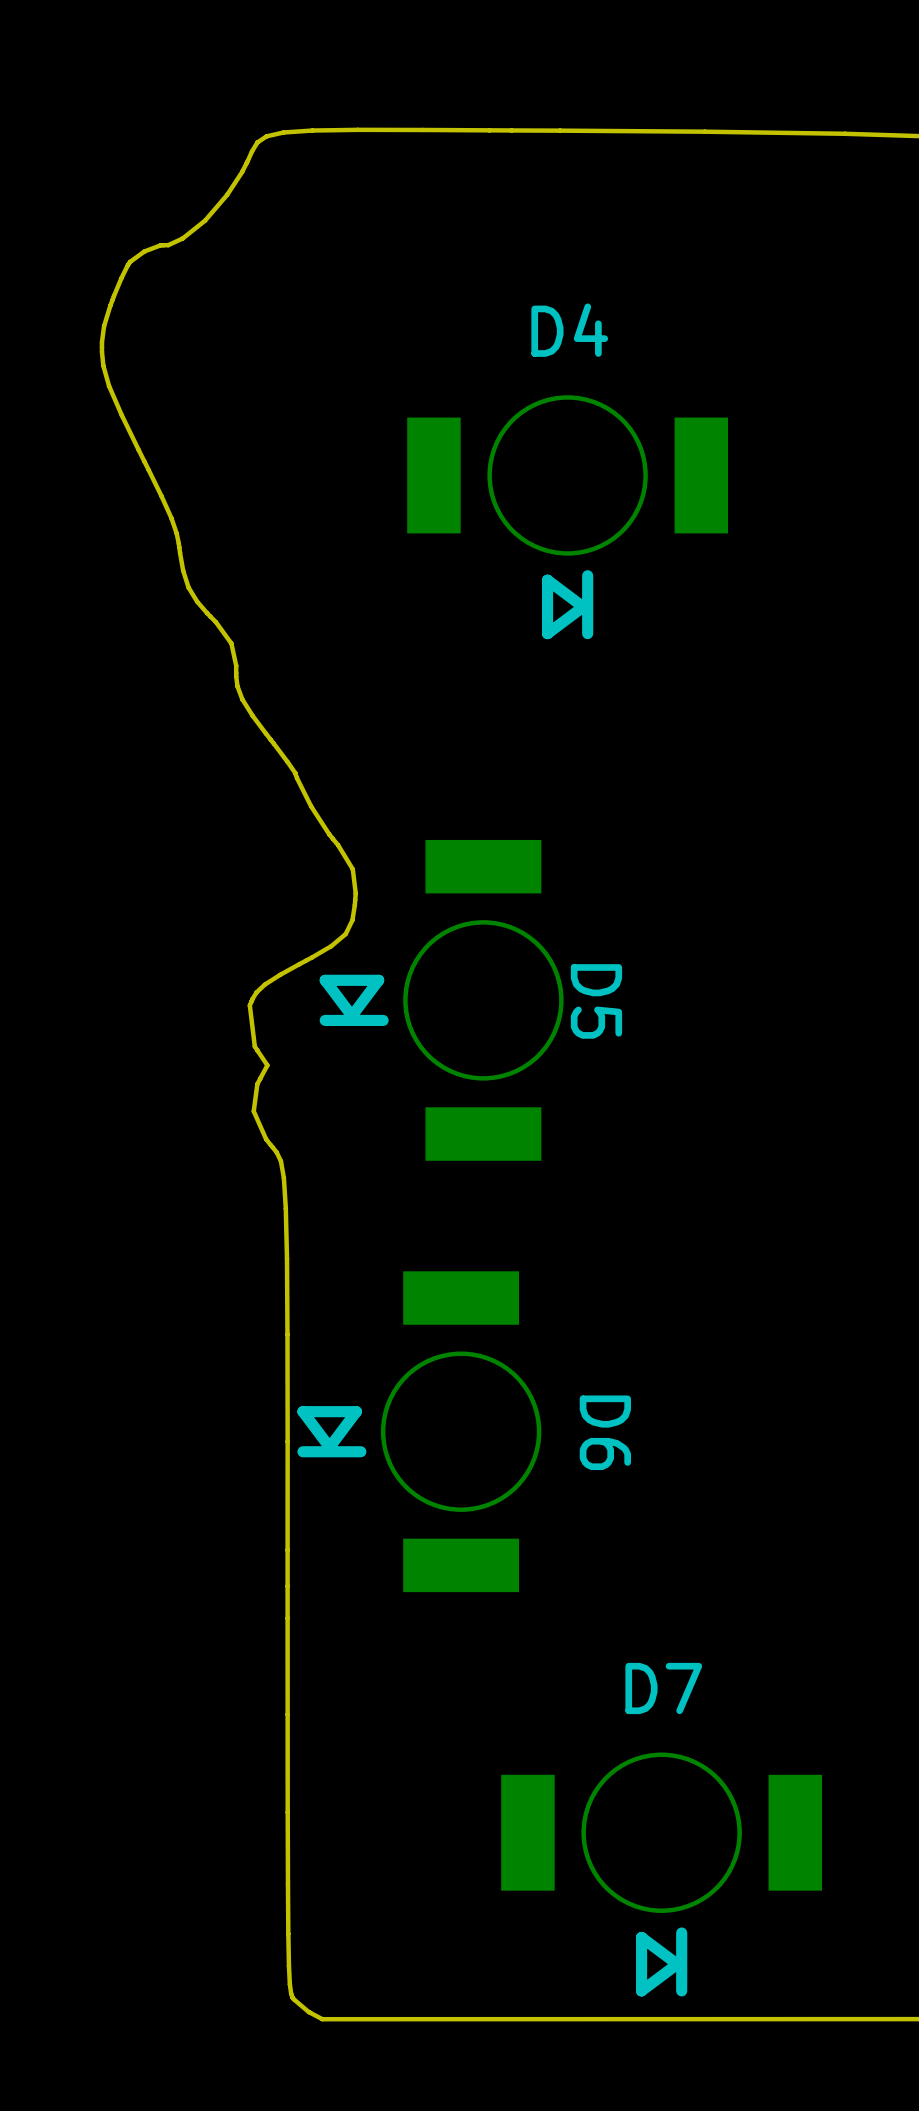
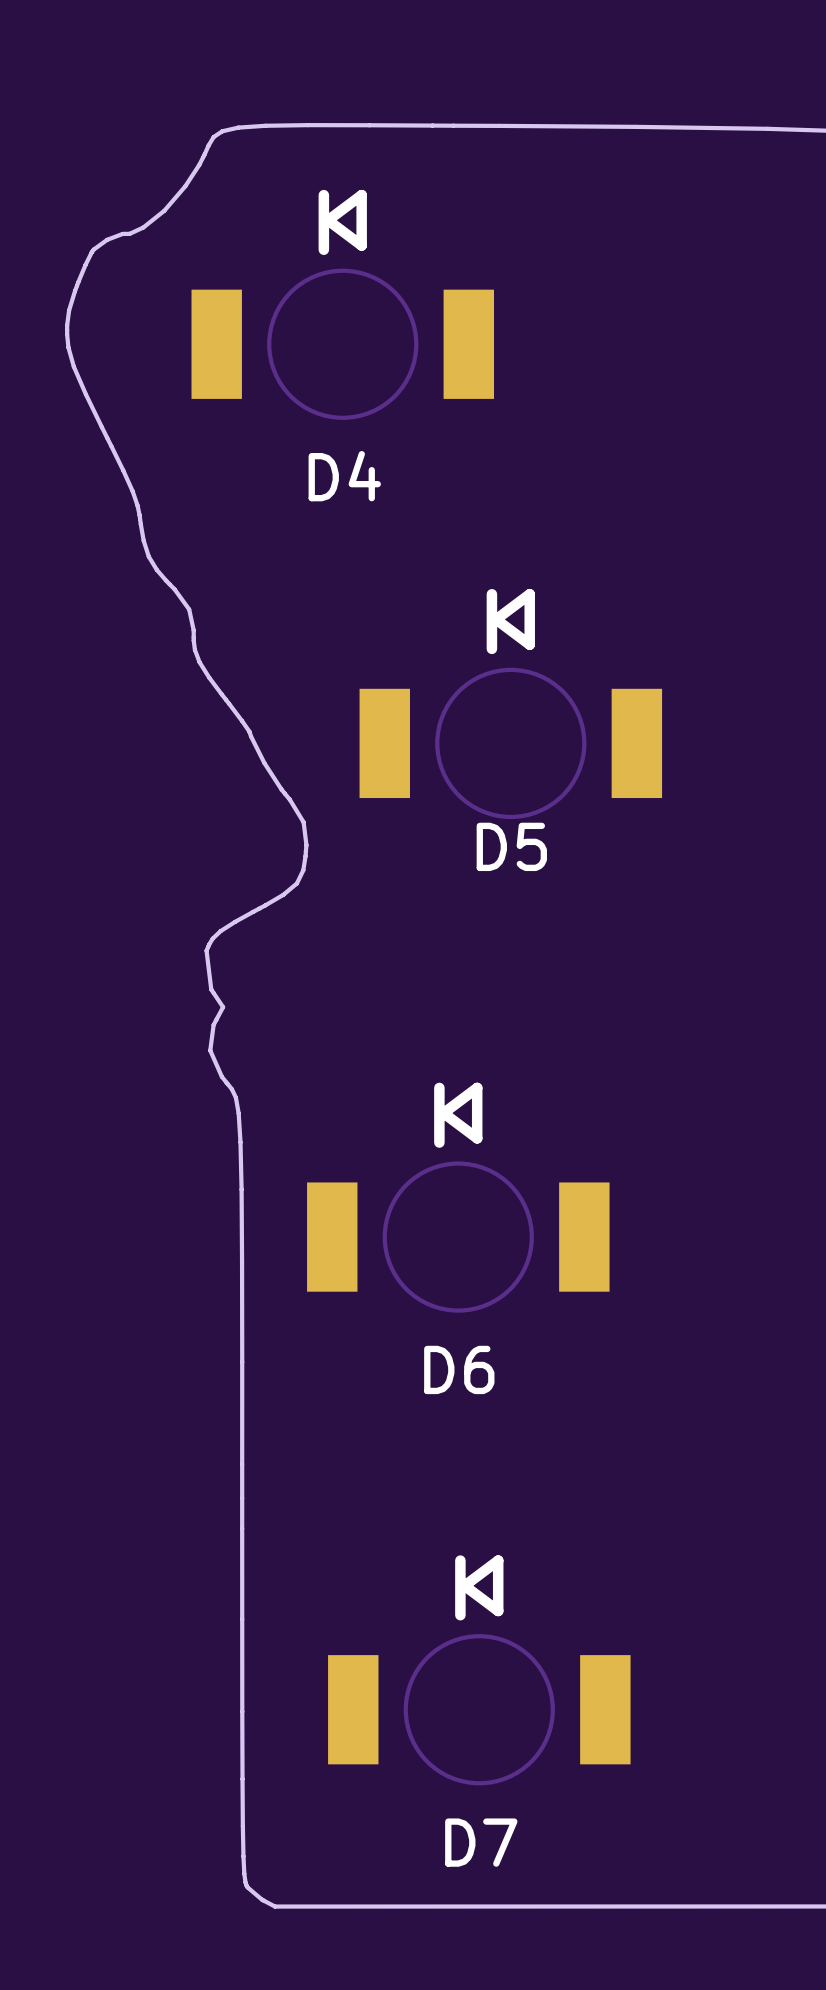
D4 rotation: 0° (567, 517) -> 180° (342, 304)
D4 position: (567, 517) -> (342, 304)
D5 rotation: 0° (441, 1000) -> 90° clockwise (510, 704)
D5 position: (441, 1000) -> (510, 704)
D6 rotation: 0° (419, 1431) -> 90° clockwise (458, 1197)
D7 rotation: 0° (661, 1874) -> 180° (479, 1670)

